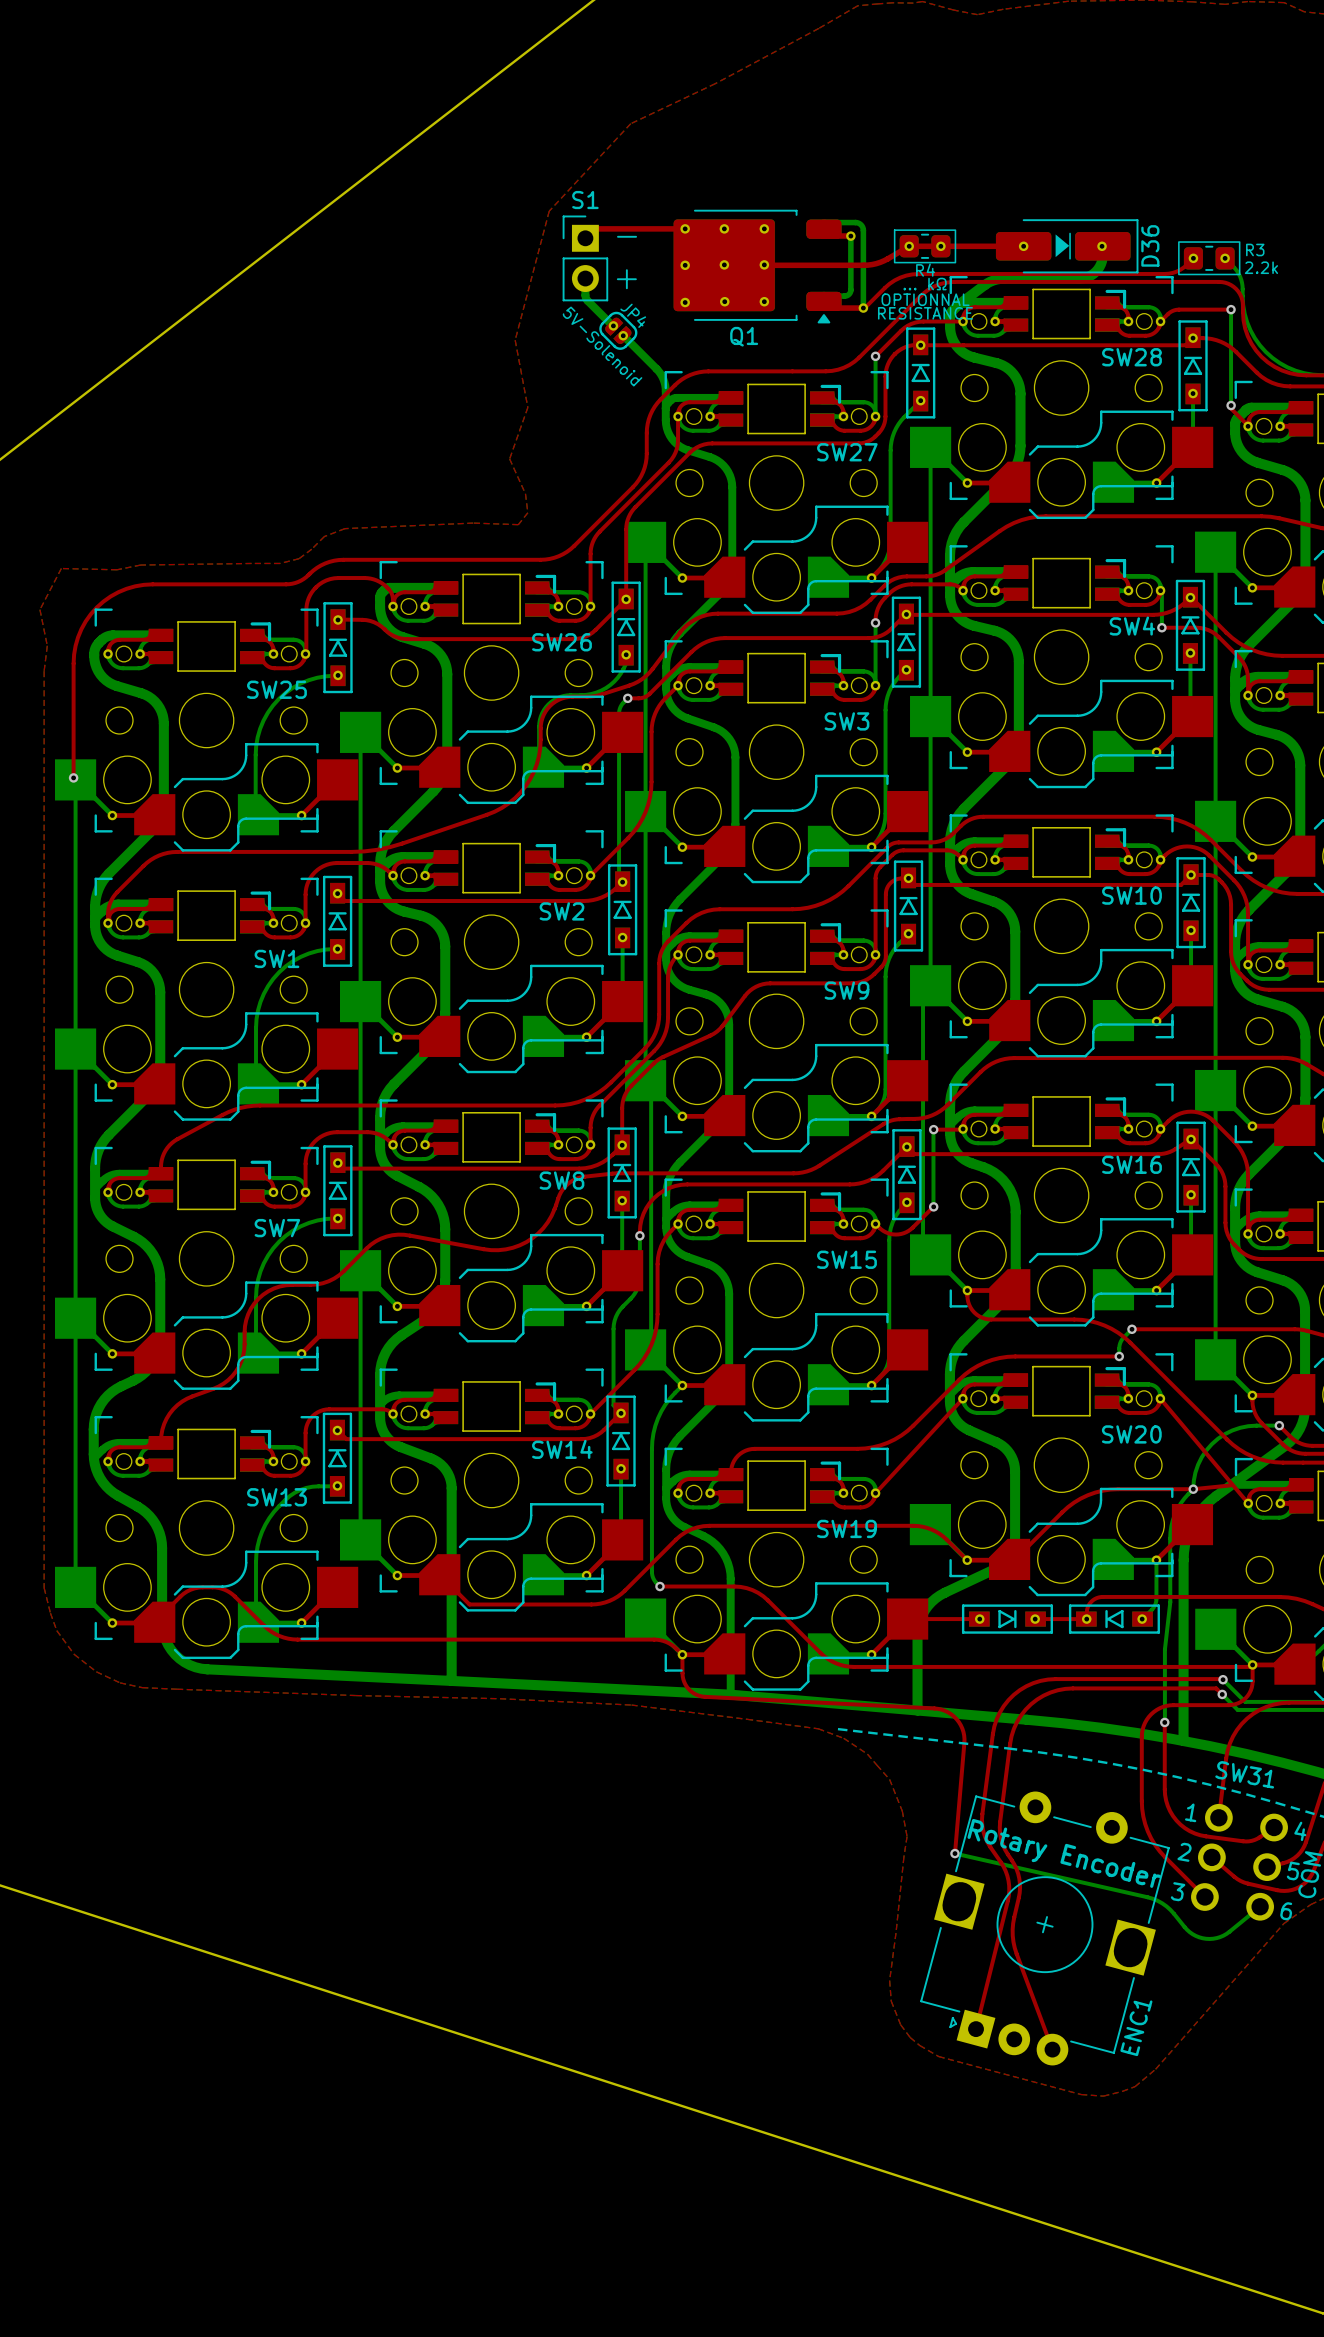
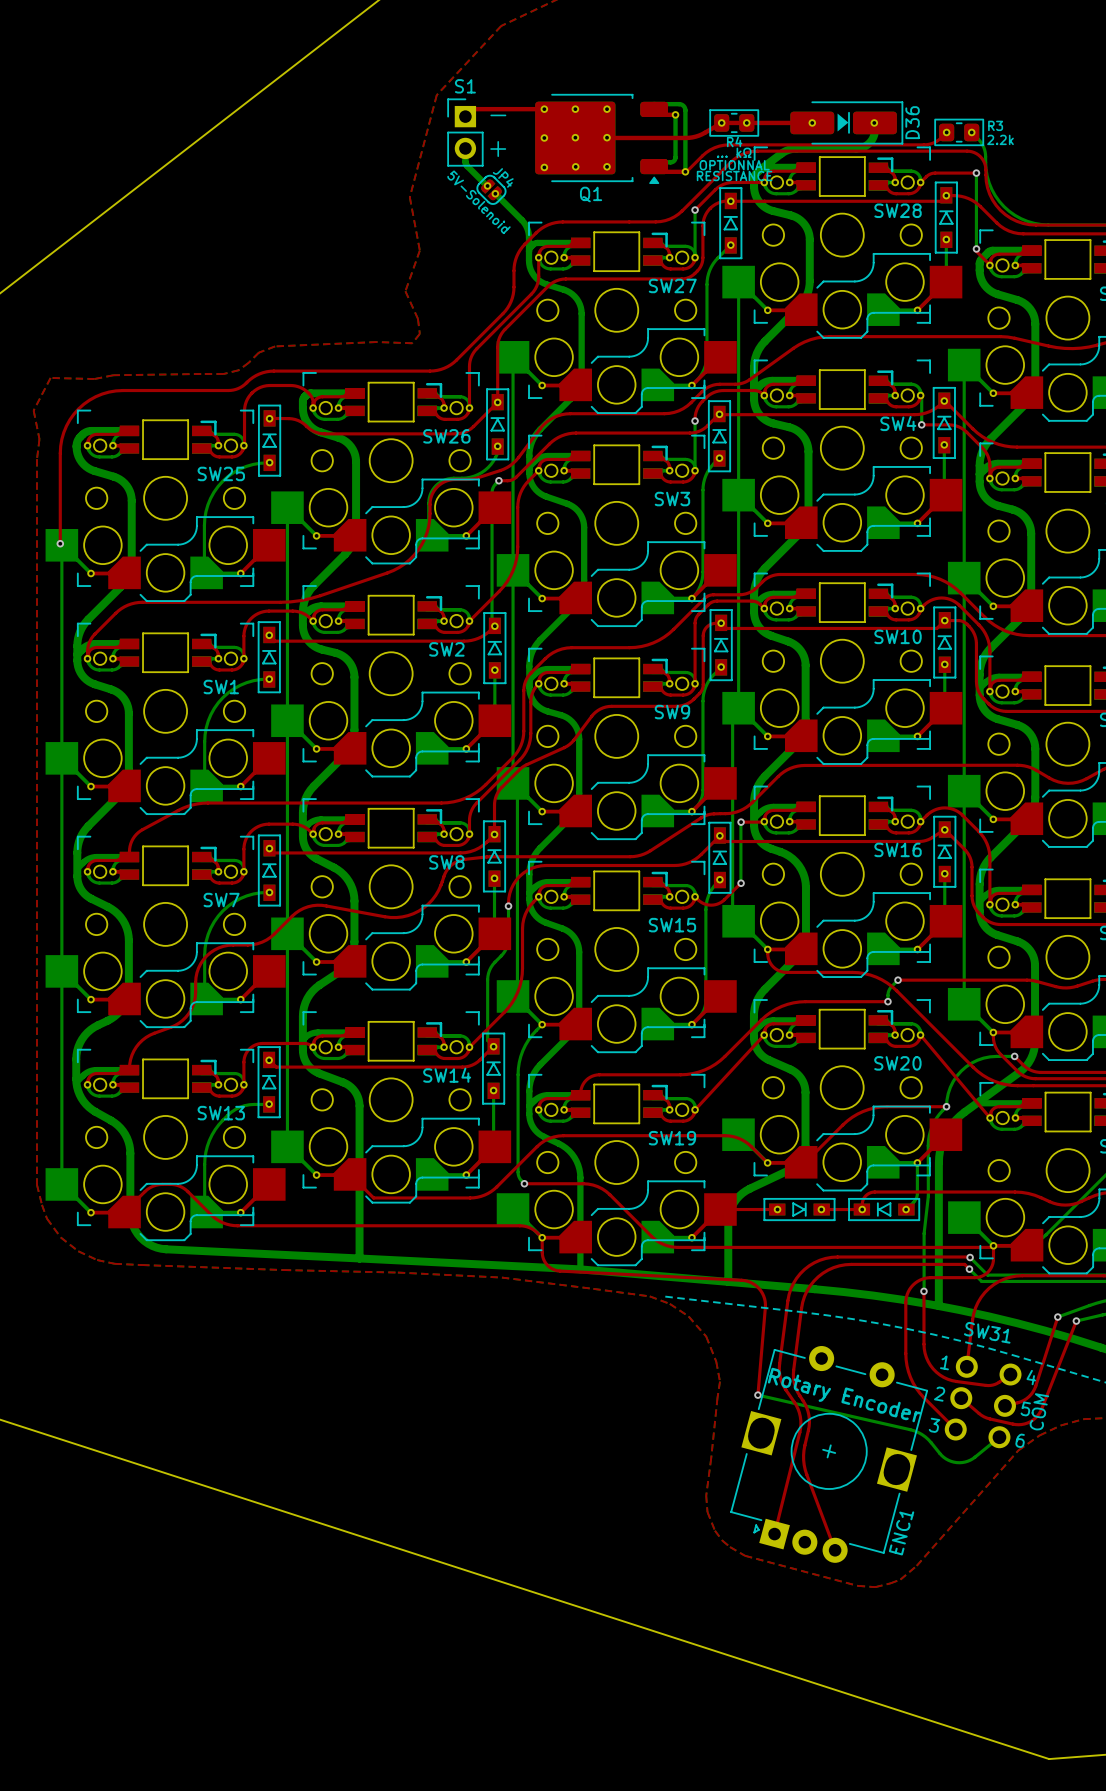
top track: (1230, 1485) (1193, 1489) -> none

